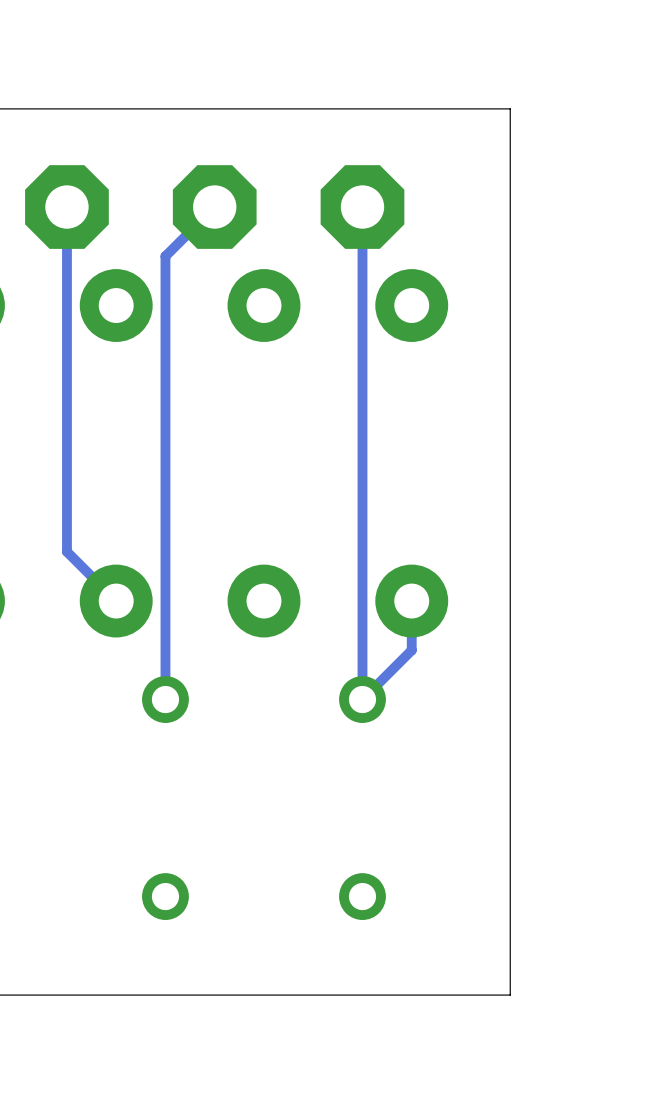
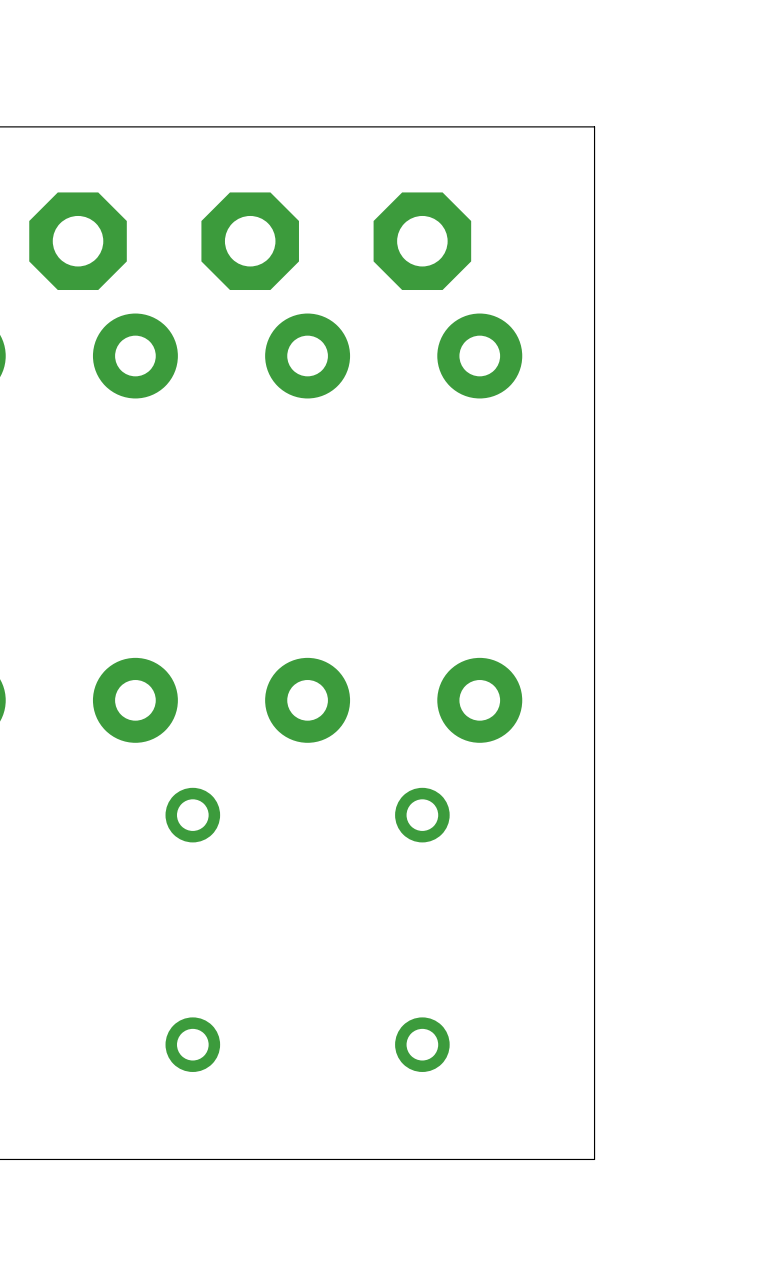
track: (66, 207) (66, 551) (116, 601) -> none
track: (214, 207) (165, 256) (165, 699) -> none
track: (362, 207) (362, 699) (411, 650) (411, 601) -> none

